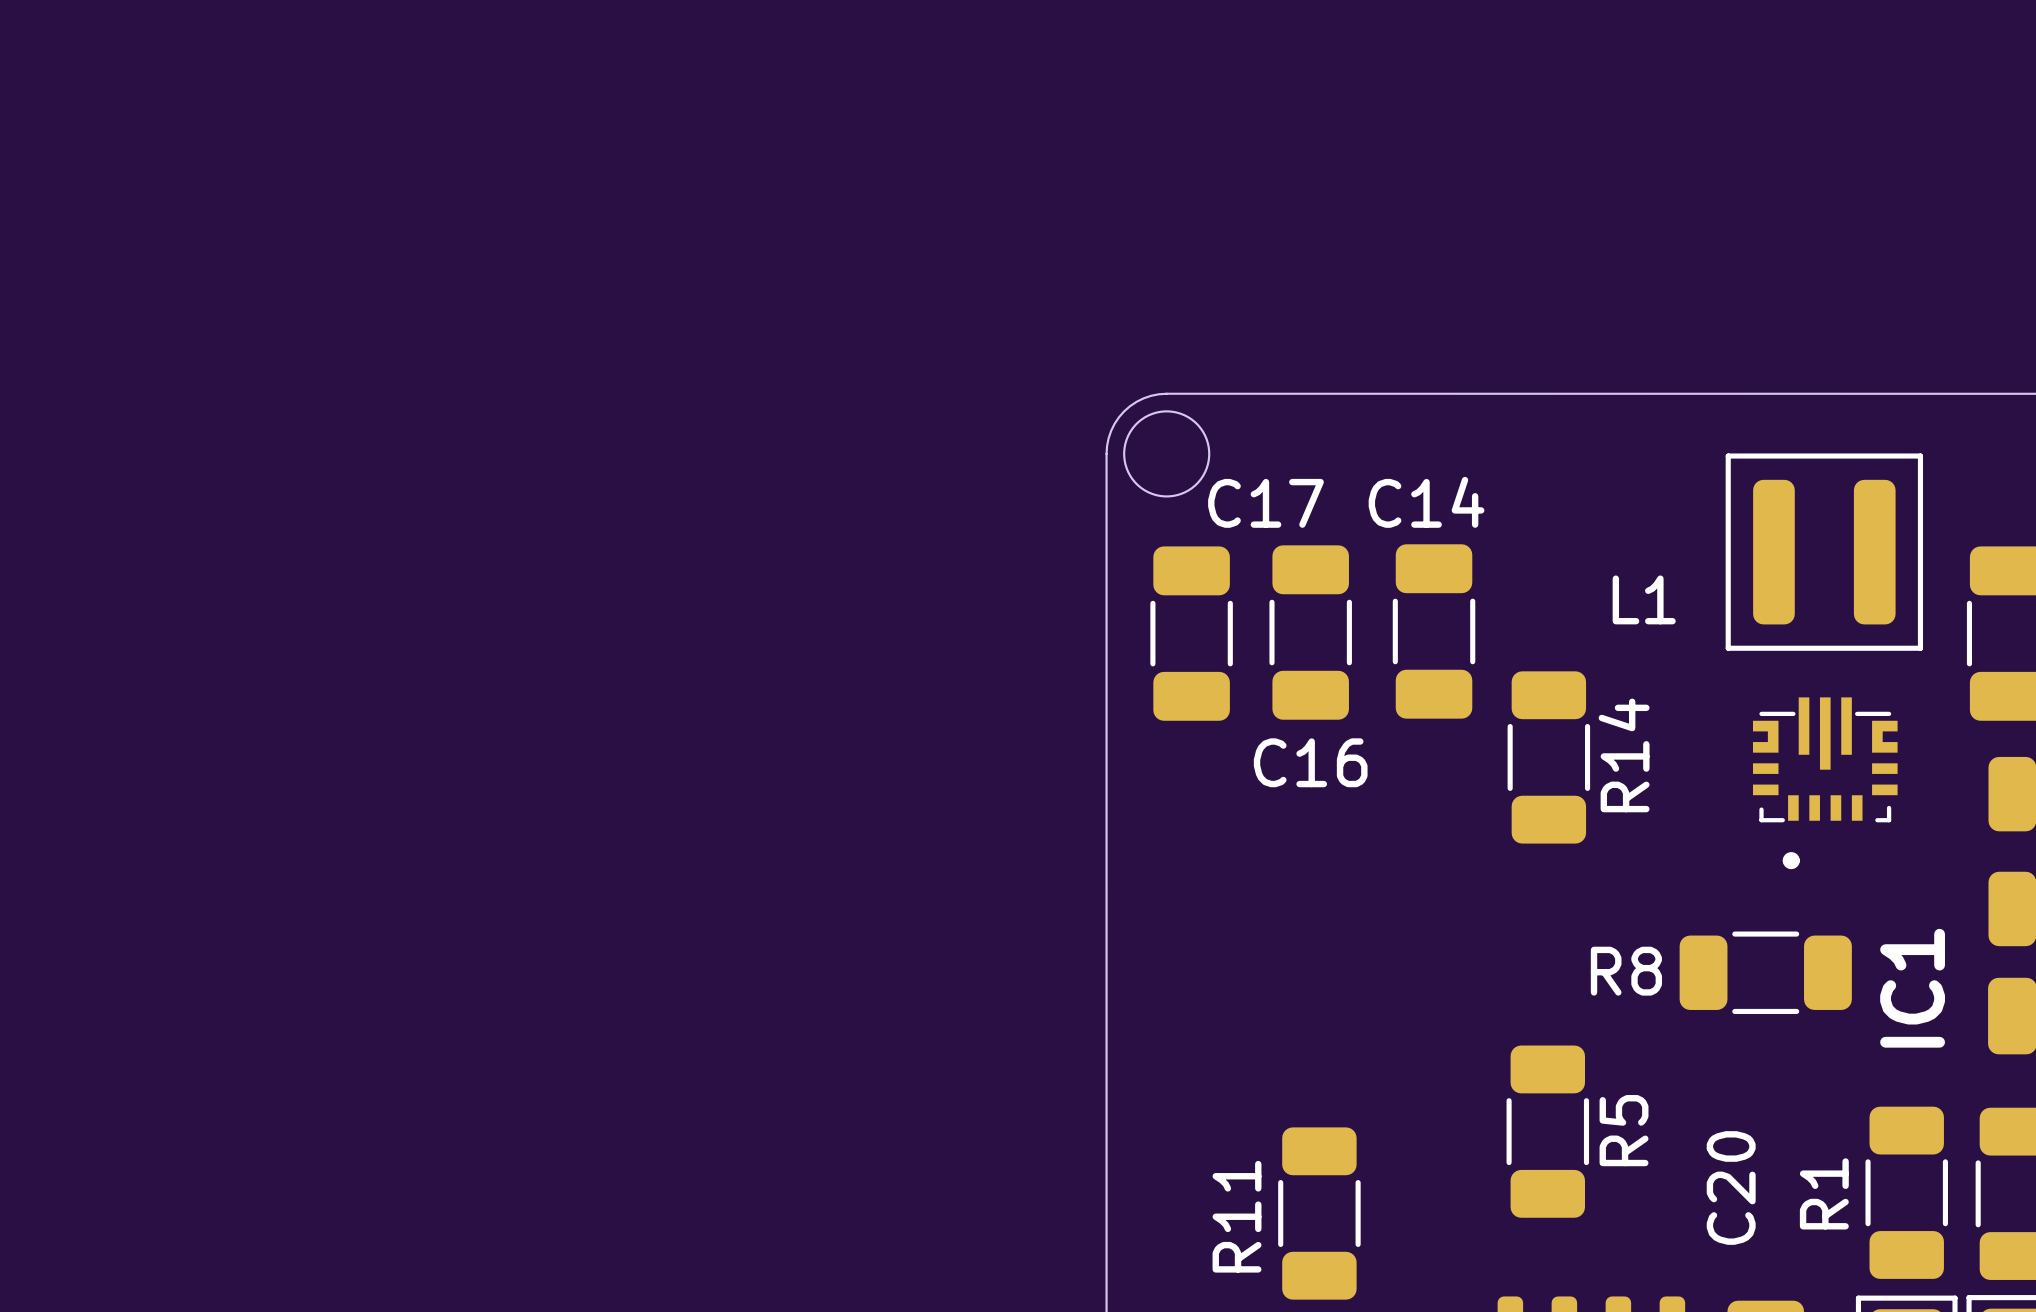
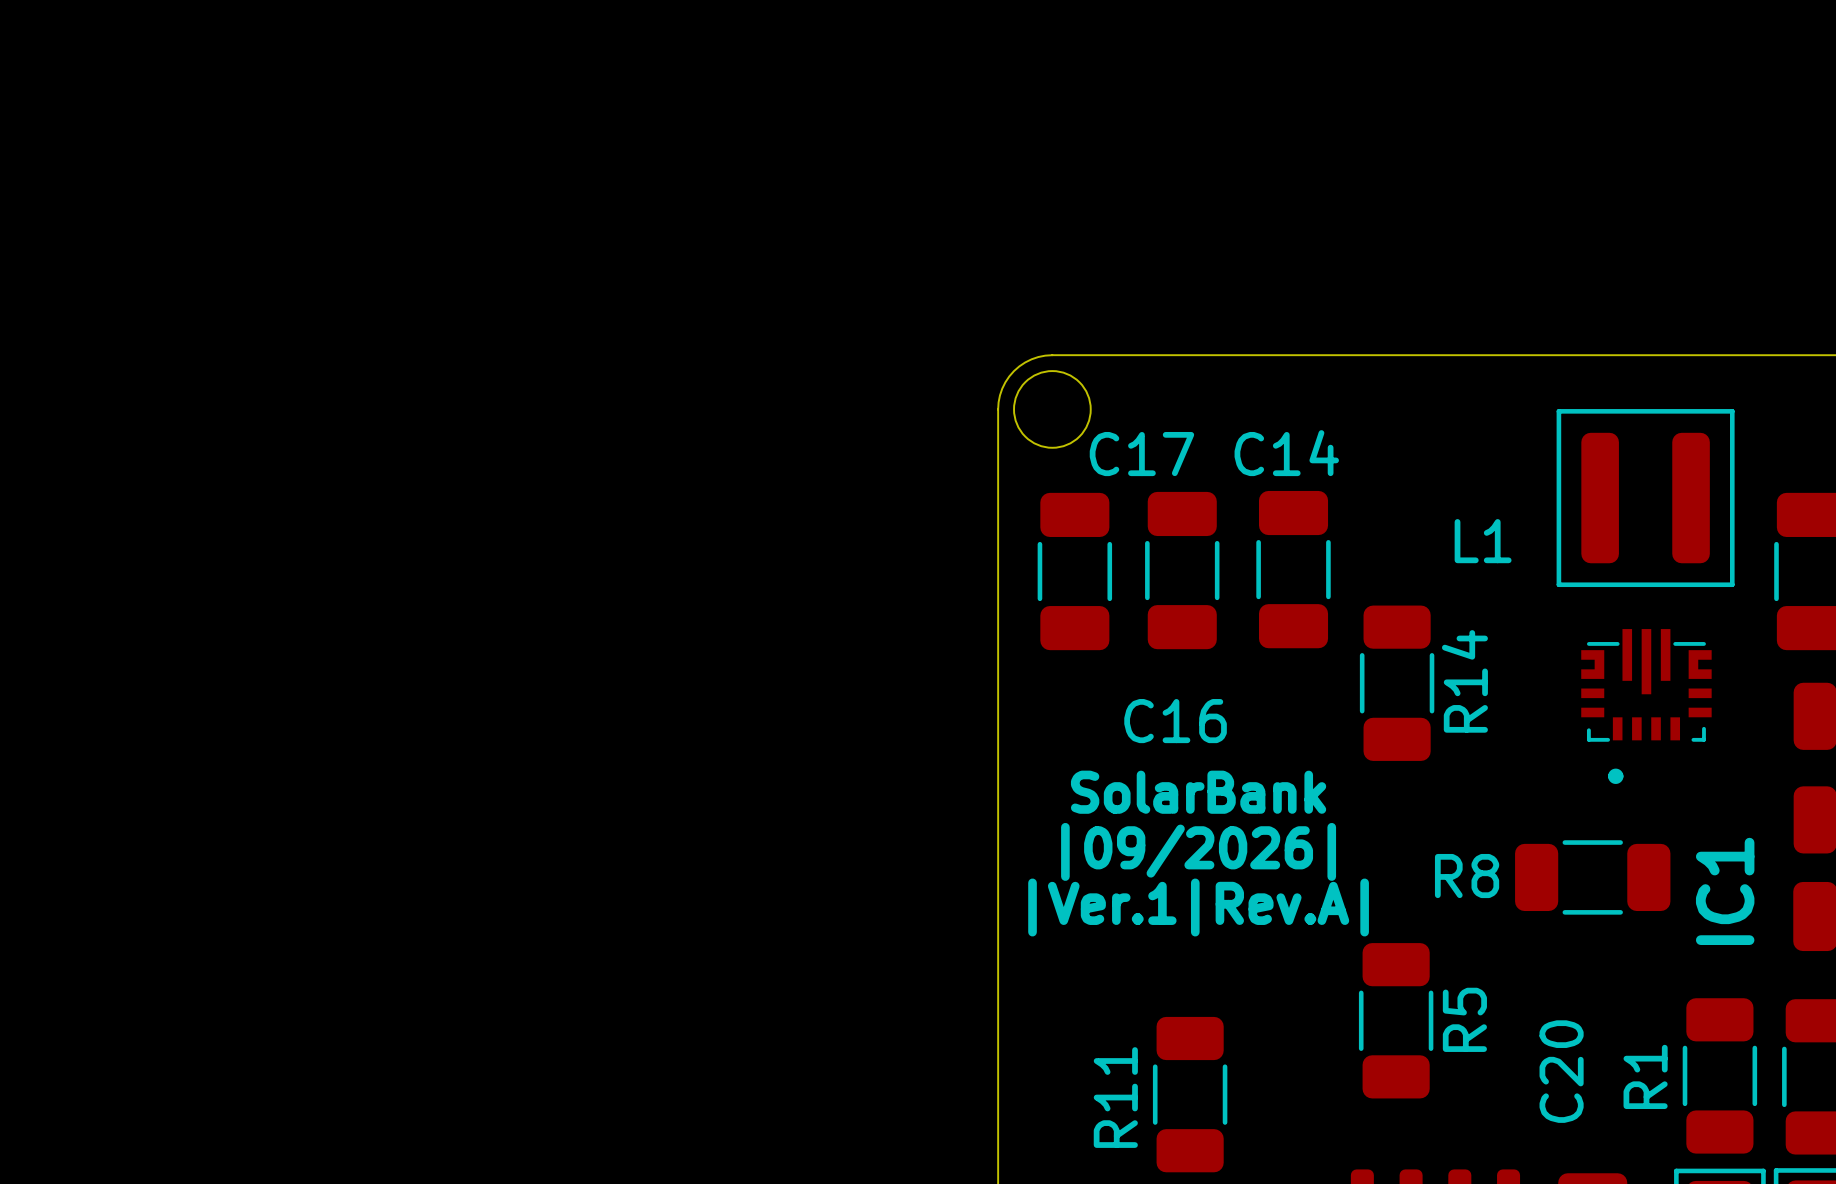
C16 name position: C16 (1310, 762) -> C16 (1175, 721)
text: none -> SolarBank (1198, 792)
text: none -> |09/2026| (1198, 851)
text: none -> |Ver.1|Rev.A| (1198, 907)

